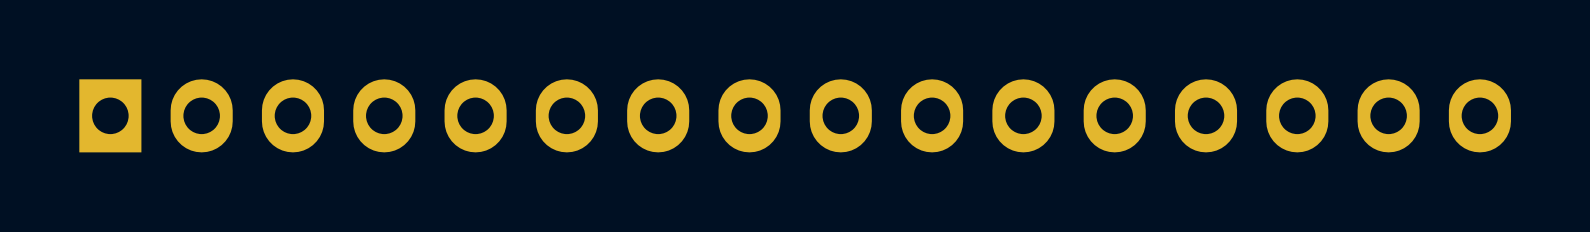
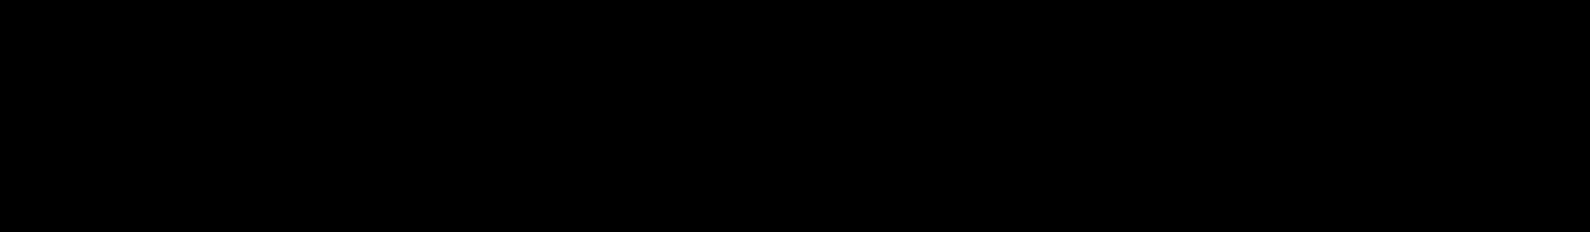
part: (795, 115) -> none

